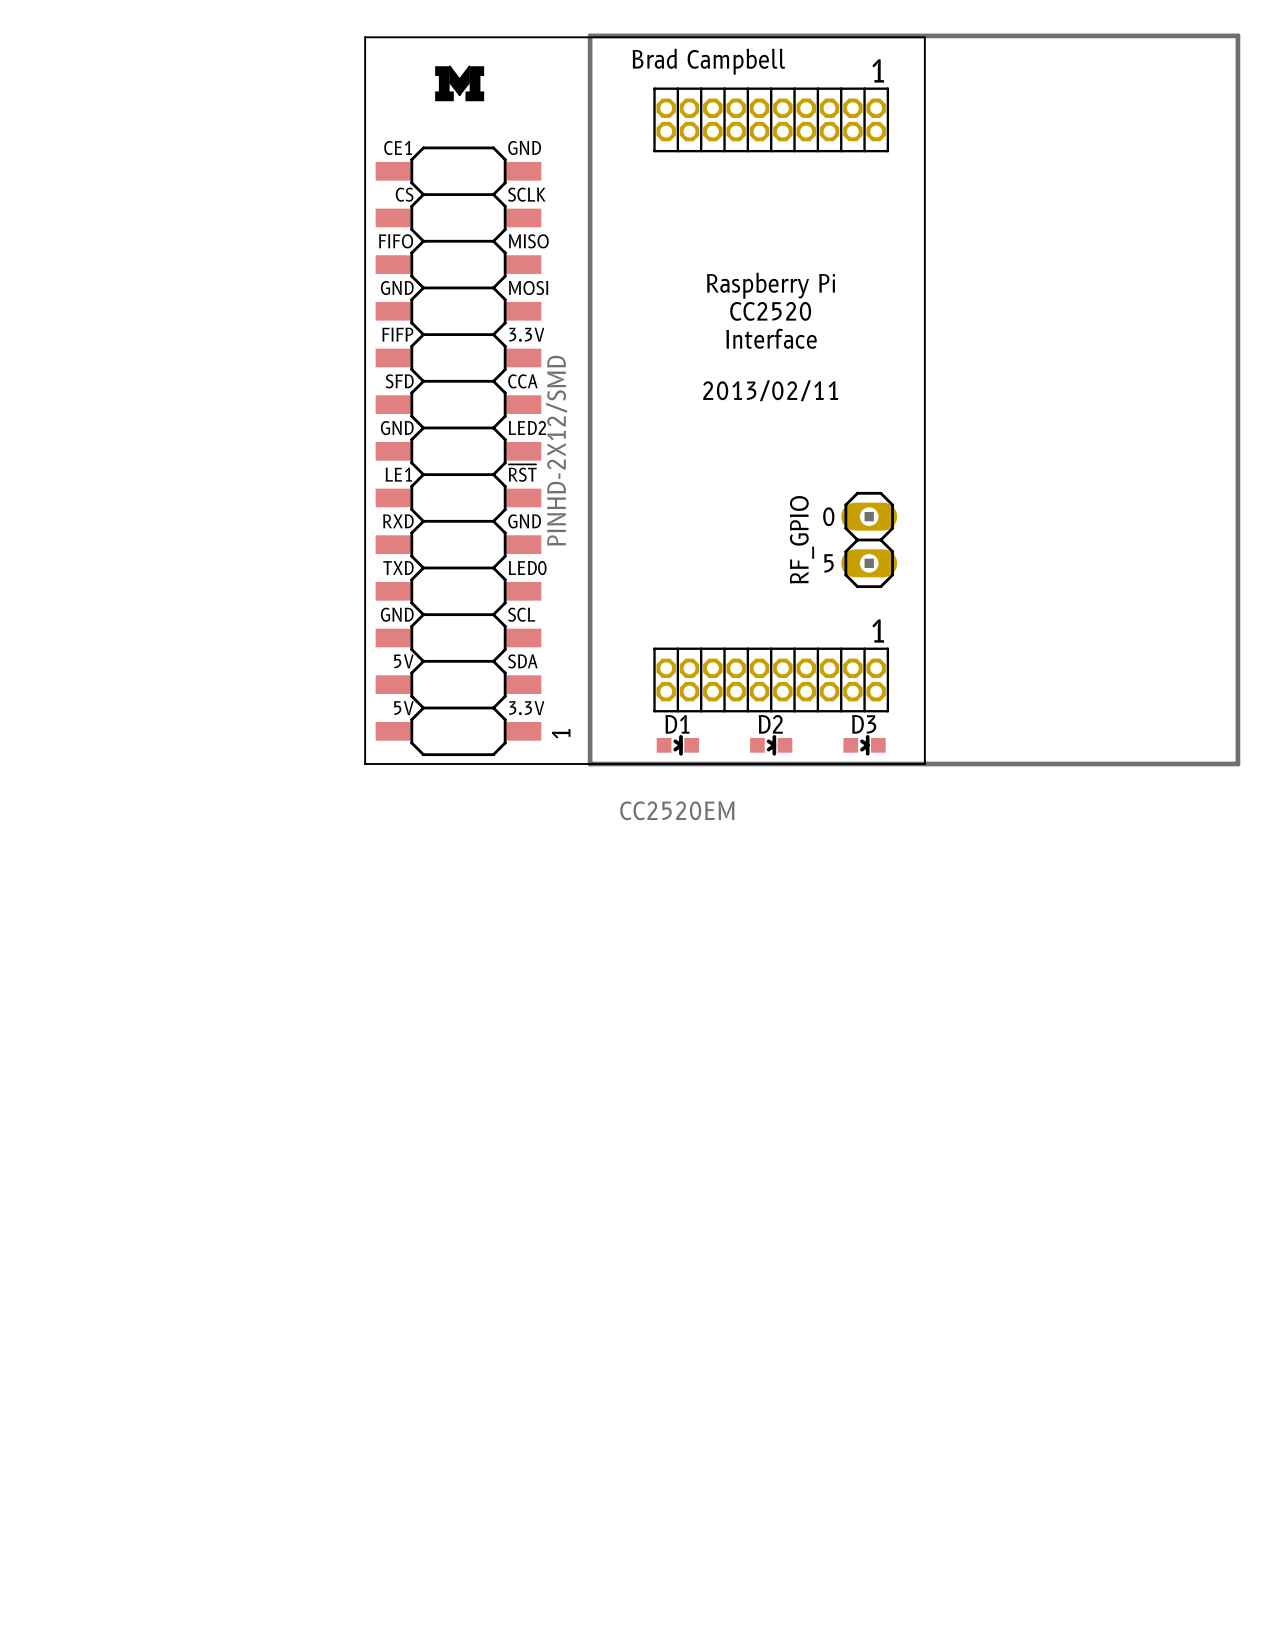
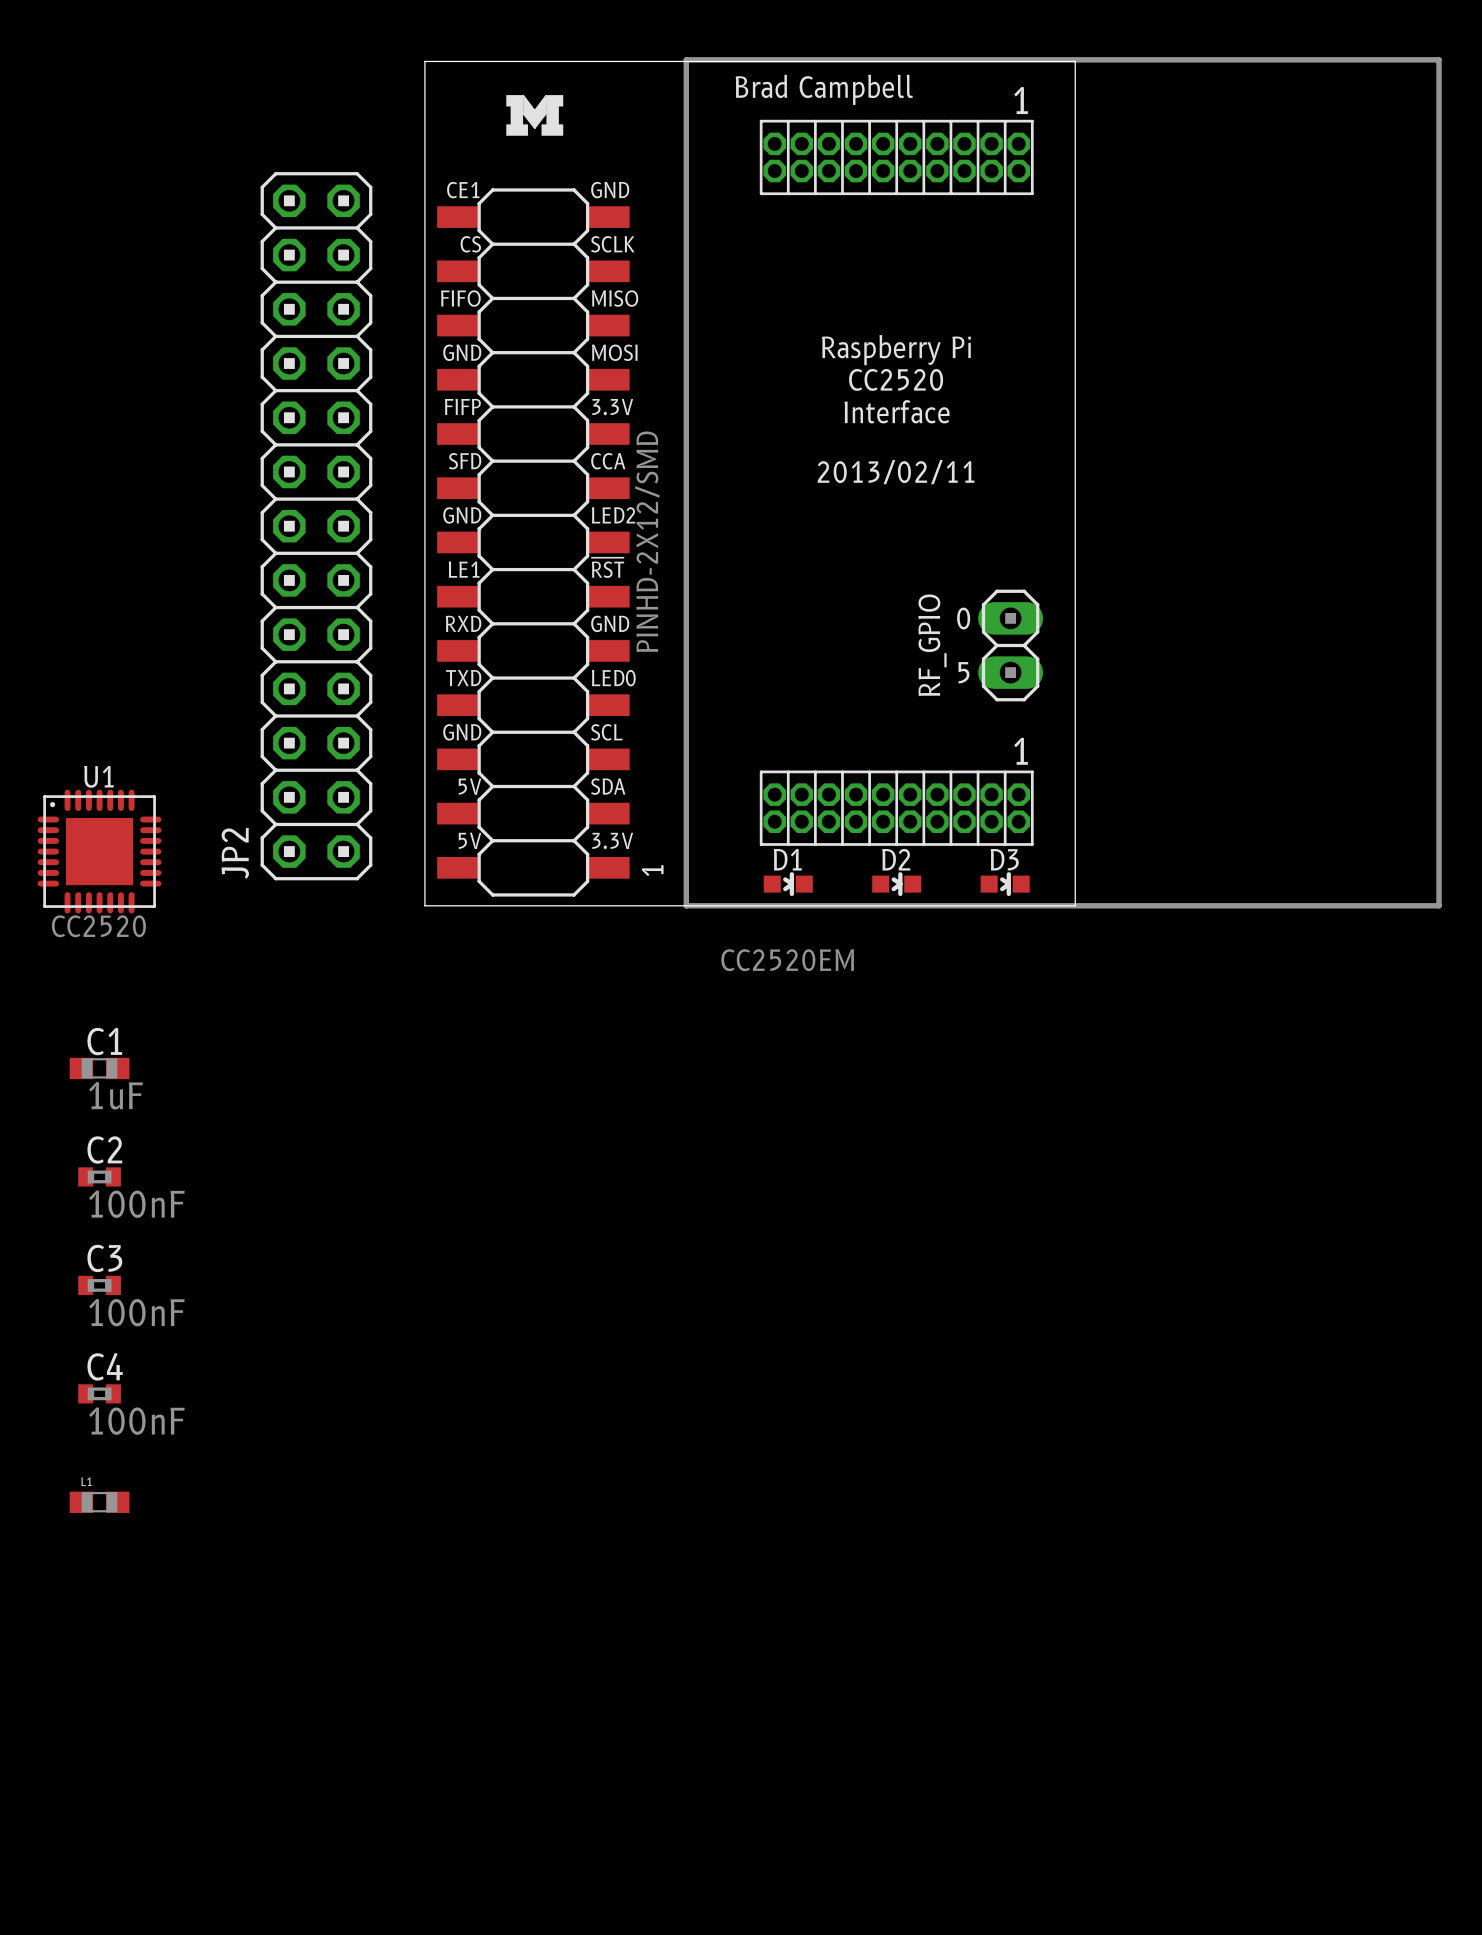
JP2: none -> (316, 526)
U1: none -> CC2520 (99, 851)
C1: none -> 1uF (99, 1068)
C2: none -> 100nF (99, 1176)
C3: none -> 100nF (99, 1285)
C4: none -> 100nF (99, 1393)
L1: none -> (99, 1502)

